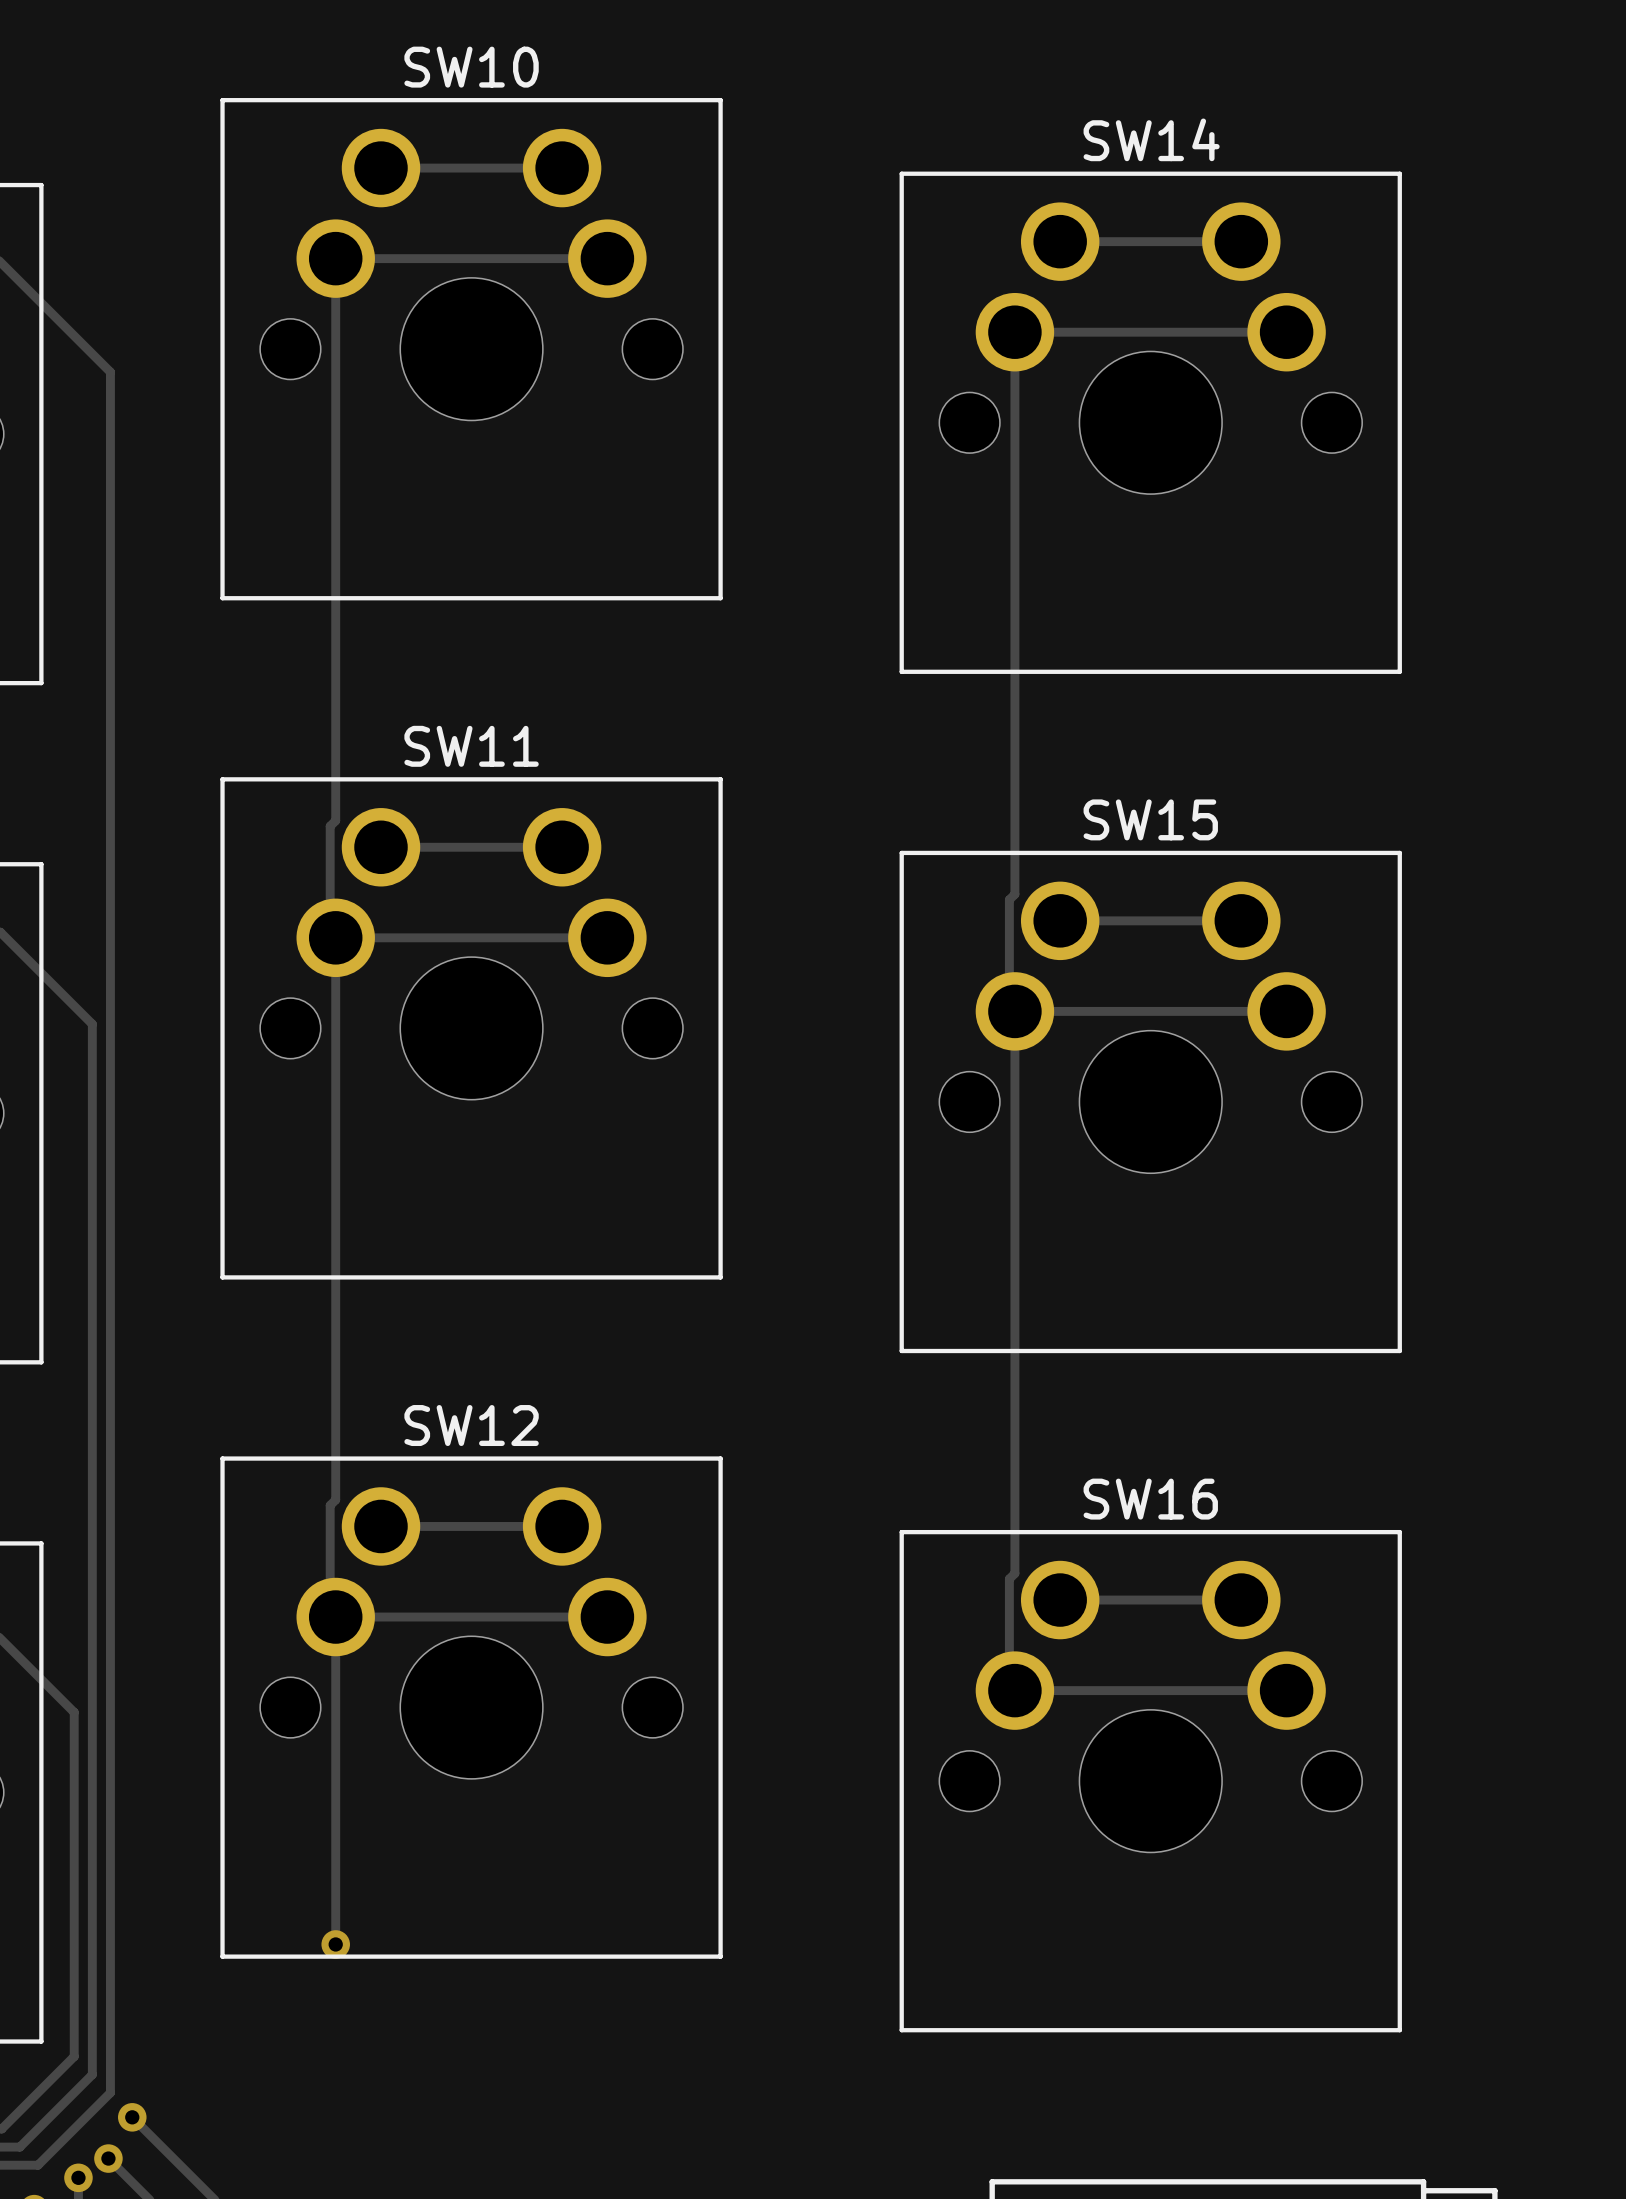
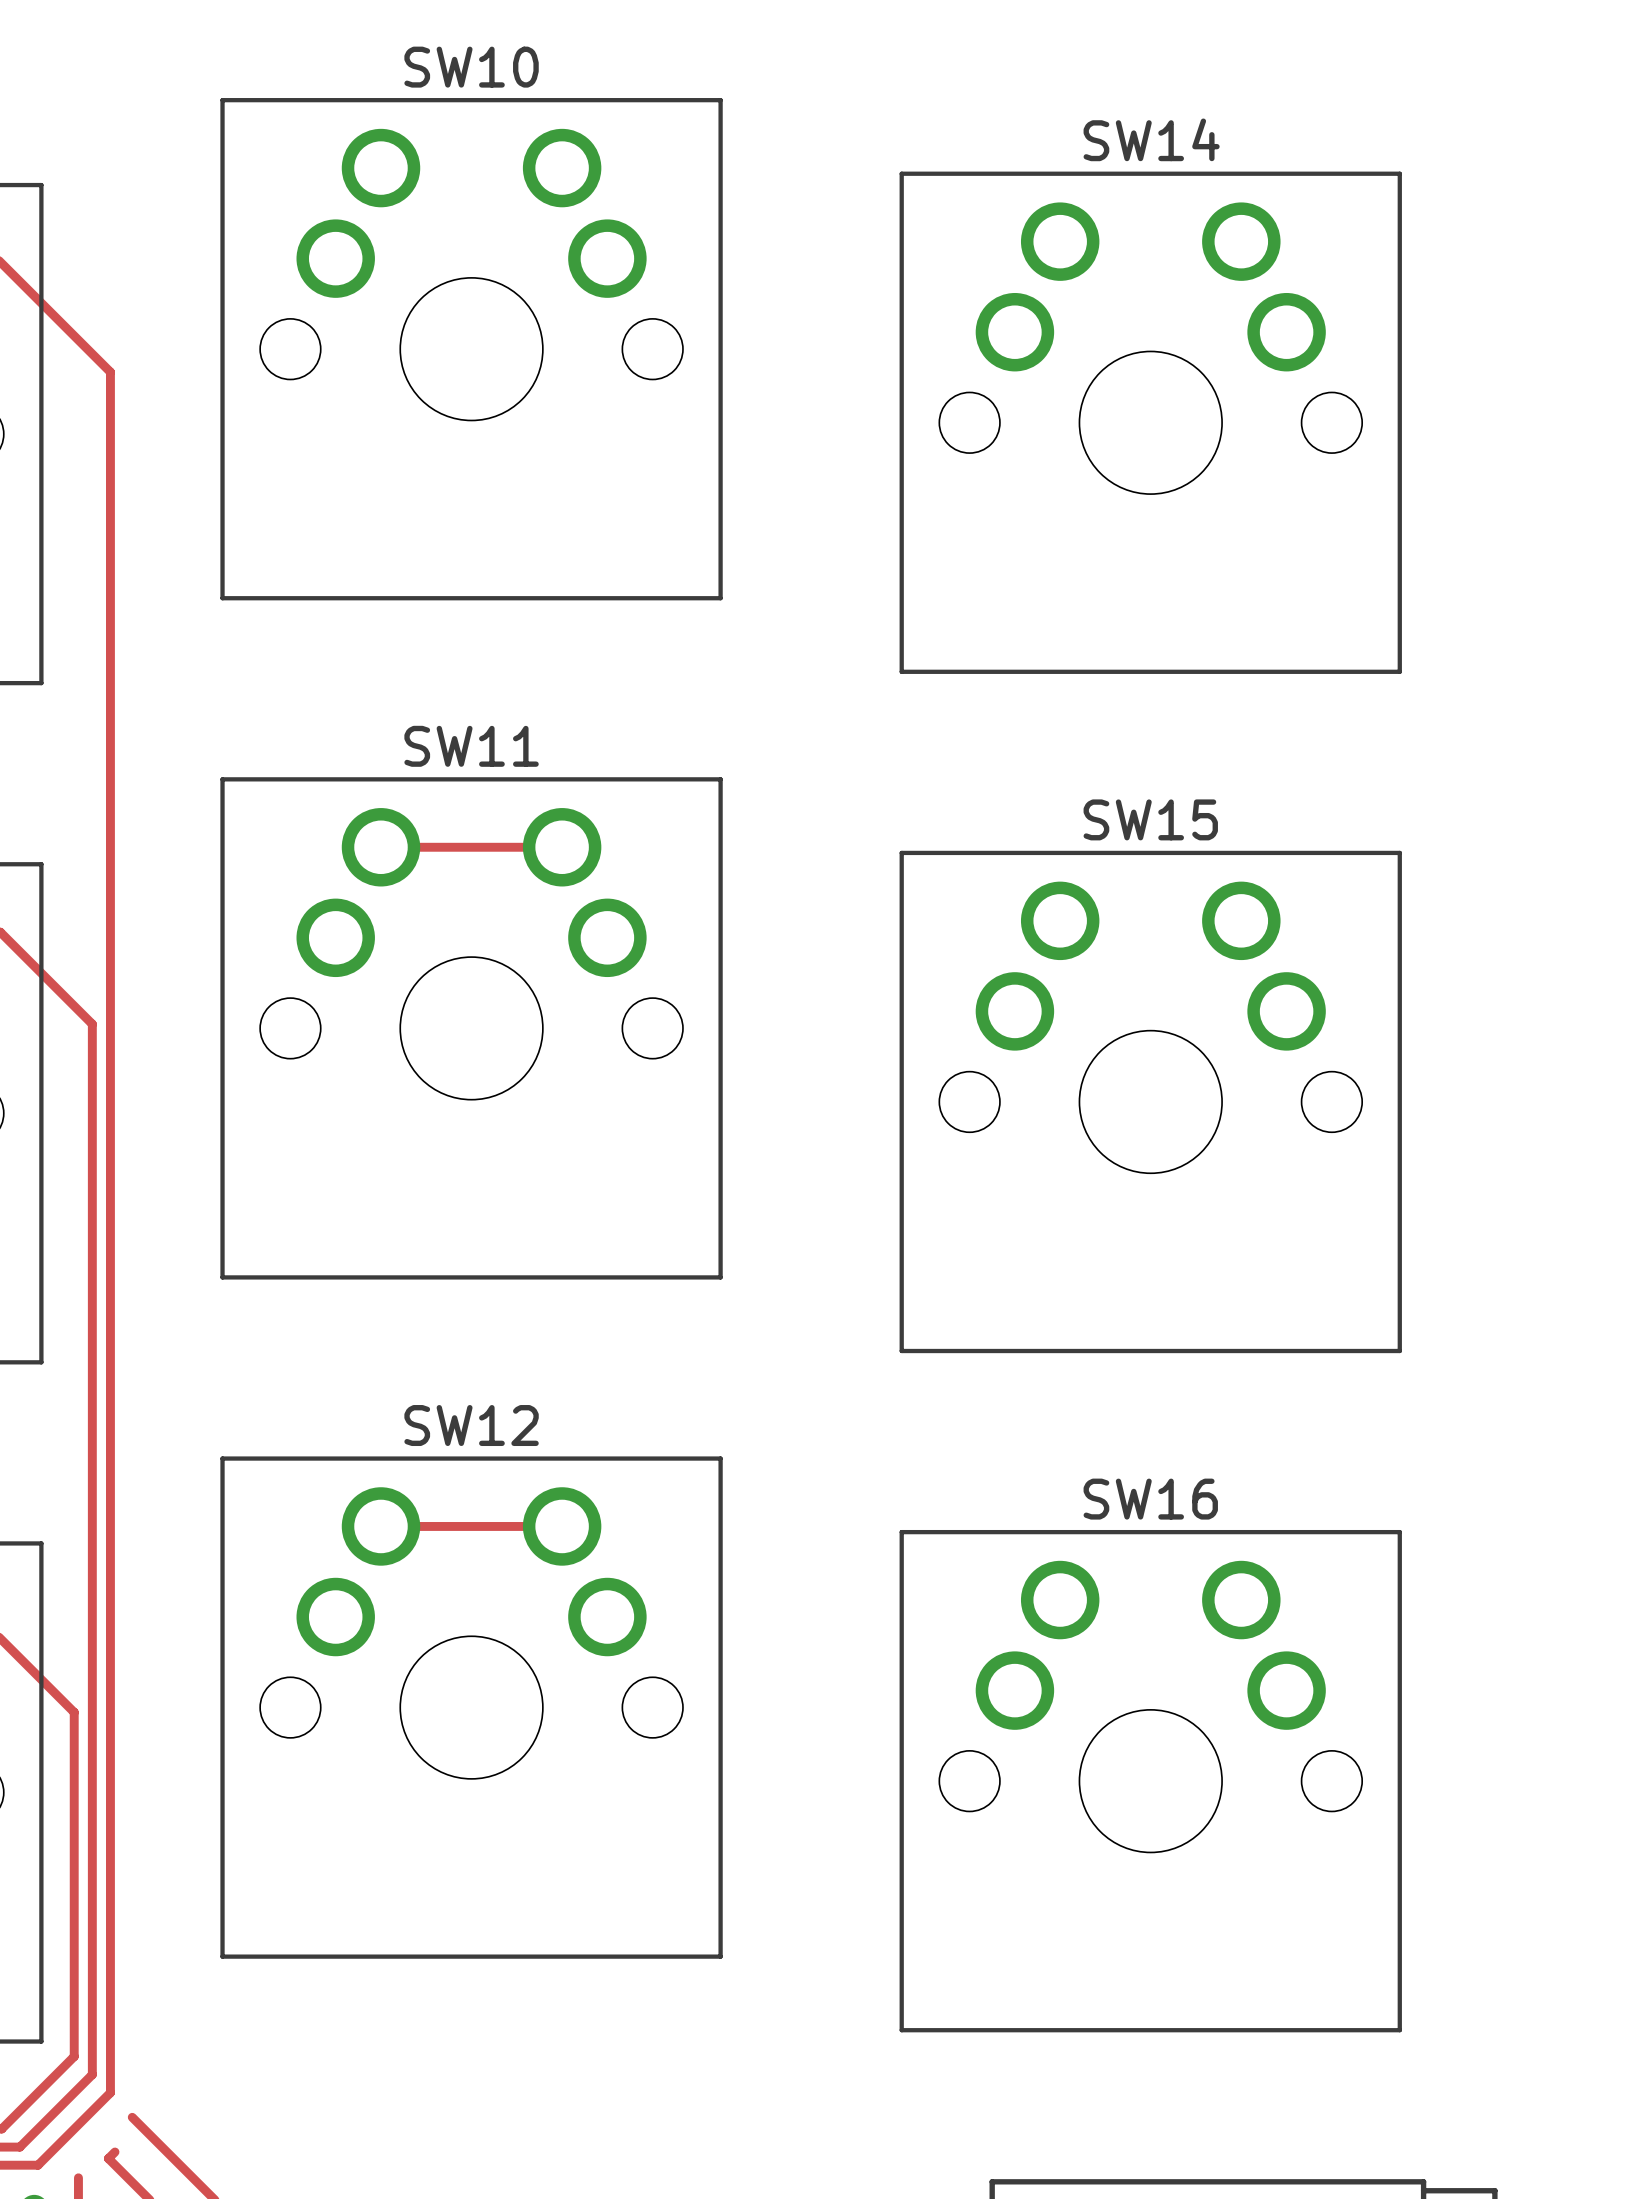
track: (381, 168) (562, 168) -> none
track: (1060, 241) (1241, 241) -> none
track: (607, 258) (335, 258) (335, 820) (330, 826) (330, 932) (335, 937) -> none
track: (1286, 332) (1014, 332) (1014, 894) (1009, 899) (1009, 1005) (1014, 1011) -> none
track: (1060, 920) (1241, 920) -> none
track: (335, 937) (607, 937) -> none
track: (335, 937) (335, 1499) (330, 1505) (330, 1611) (335, 1617) -> none
track: (1014, 1011) (1286, 1011) -> none
track: (1014, 1011) (1014, 1573) (1009, 1579) (1009, 1685) (1014, 1690) (1286, 1690) -> none
track: (1060, 1600) (1241, 1600) -> none
track: (335, 1617) (335, 1944) -> none
track: (335, 1617) (607, 1617) -> none
via: (335, 1944) -> none
via: (132, 2117) -> none
via: (108, 2158) -> none
via: (78, 2177) -> none

